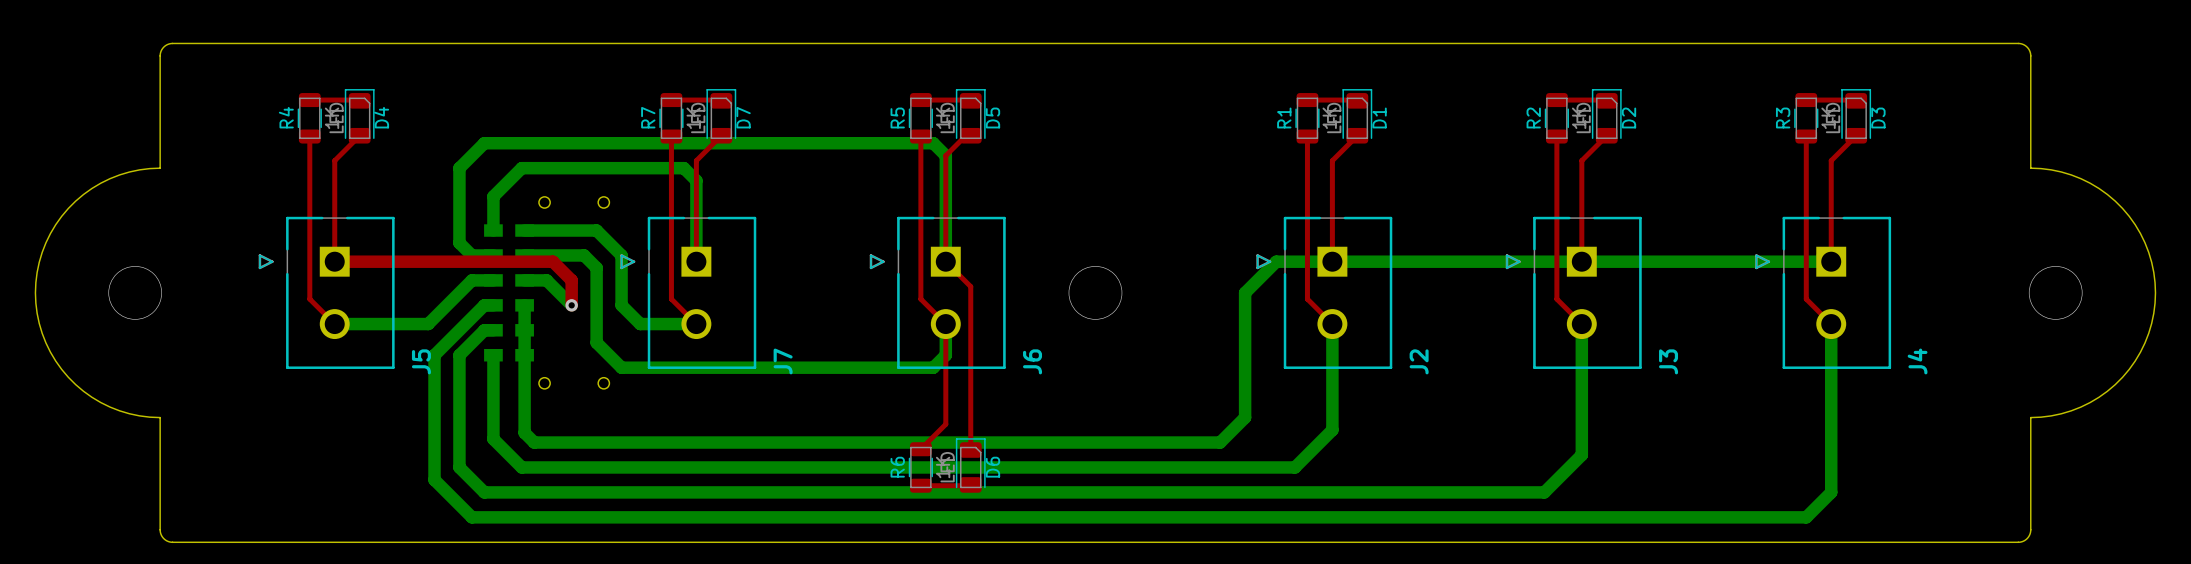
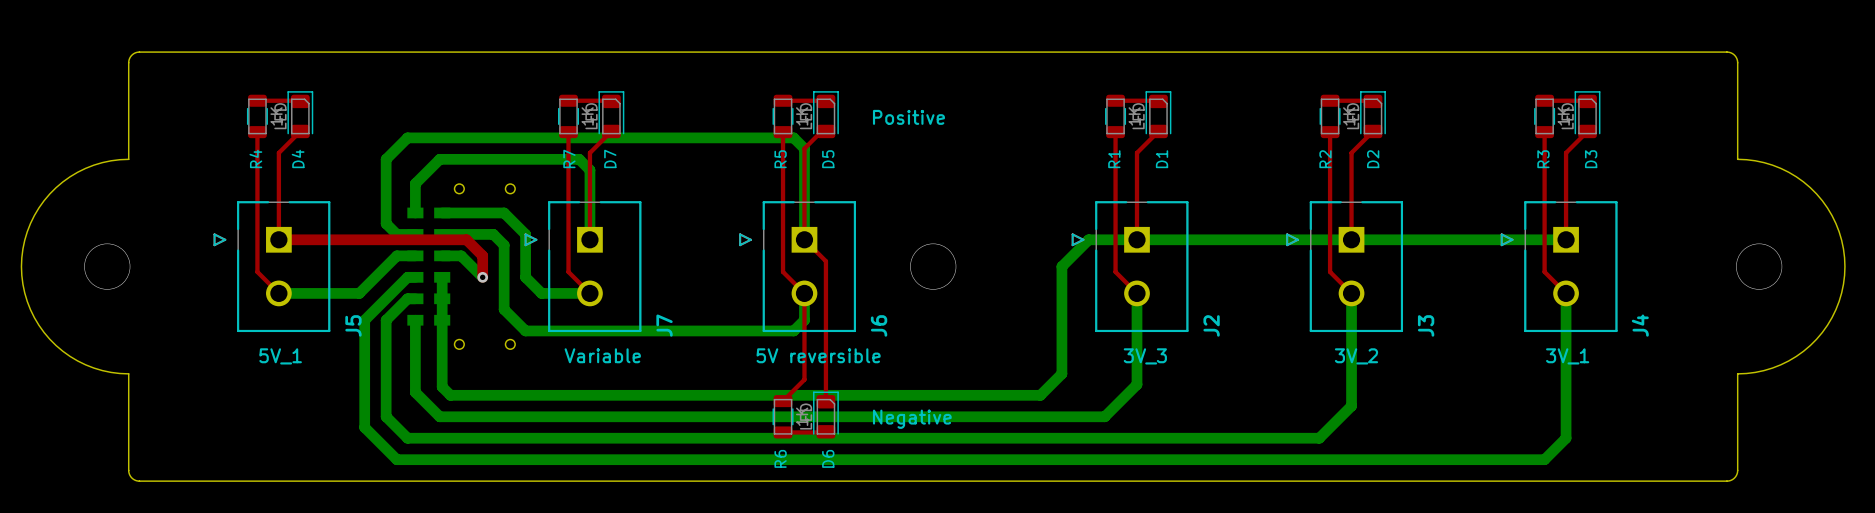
R4 name position: R4 (286, 117) -> R4 (255, 158)
D4 name position: D4 (381, 117) -> D4 (298, 158)
R7 name position: R7 (648, 117) -> R7 (569, 158)
D7 name position: D7 (743, 117) -> D7 (610, 158)
R5 name position: R5 (897, 117) -> R5 (780, 159)
D5 name position: D5 (992, 117) -> D5 (828, 159)
R1 name position: R1 (1284, 117) -> R1 (1114, 159)
D1 name position: D1 (1379, 117) -> D1 (1162, 159)
R2 name position: R2 (1533, 117) -> R2 (1325, 159)
D2 name position: D2 (1628, 117) -> D2 (1373, 159)
R3 name position: R3 (1783, 117) -> R3 (1543, 159)
D3 name position: D3 (1878, 117) -> D3 (1591, 159)
text: none -> Positive (908, 117)
text: none -> Variable (602, 355)
text: none -> 5V reversible (818, 355)
text: none -> 5V_1 (280, 356)
text: none -> 3V_3 (1145, 356)
text: none -> 3V_2 (1356, 356)
text: none -> 3V_1 (1567, 356)
R6 name position: R6 (897, 467) -> R6 (780, 458)
D6 name position: D6 (992, 467) -> D6 (828, 458)
text: none -> Negative (912, 419)

